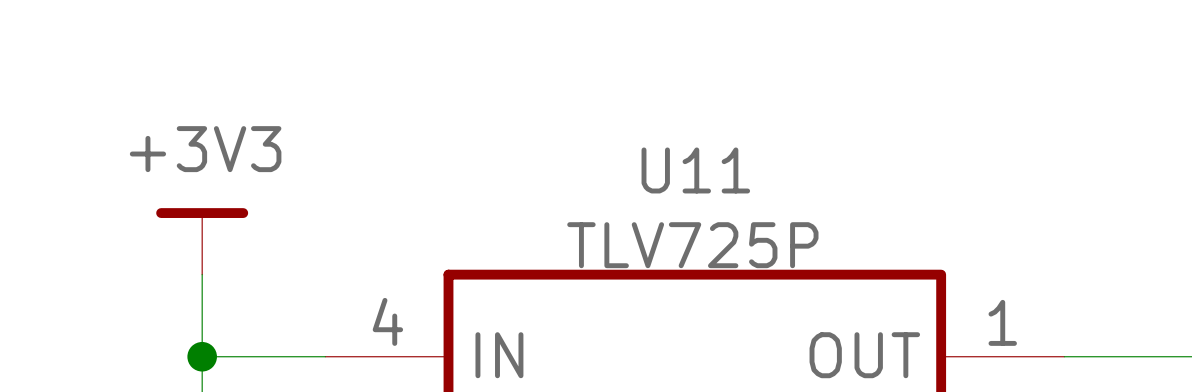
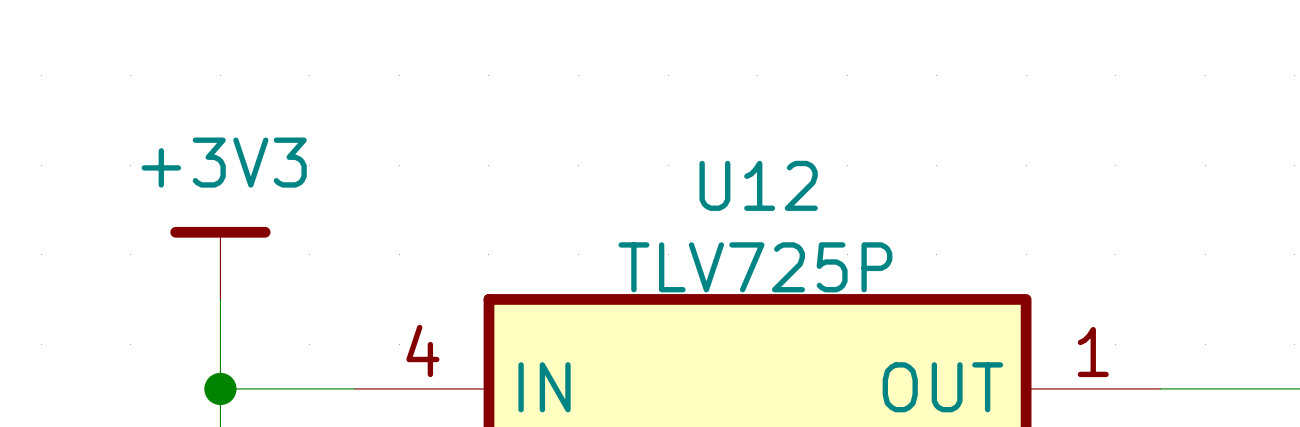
U11 name: U11 (695, 170) -> U12 (758, 185)

